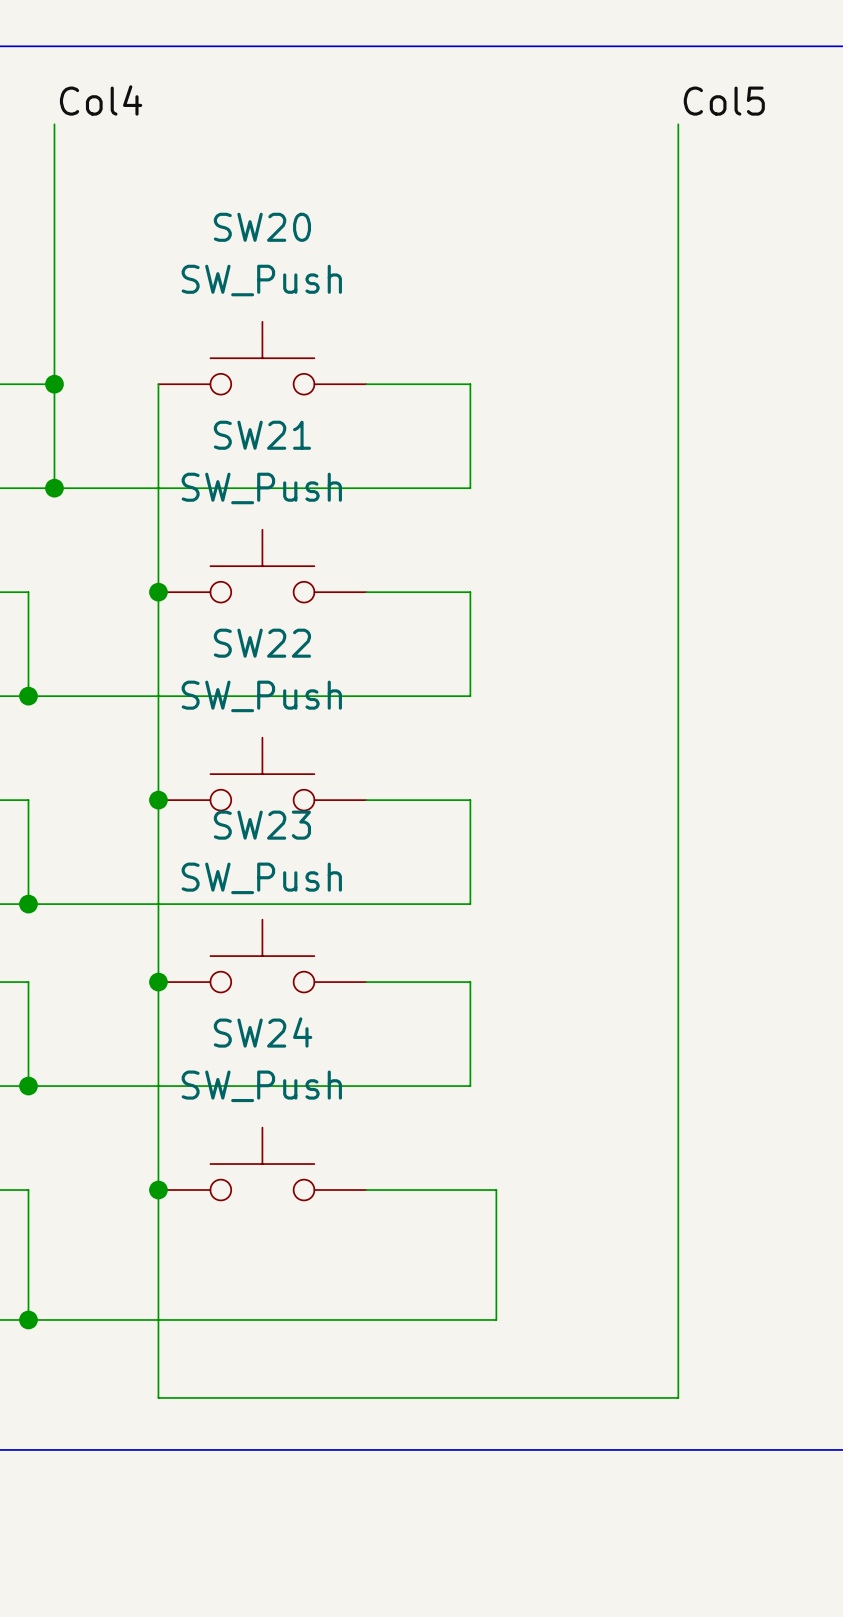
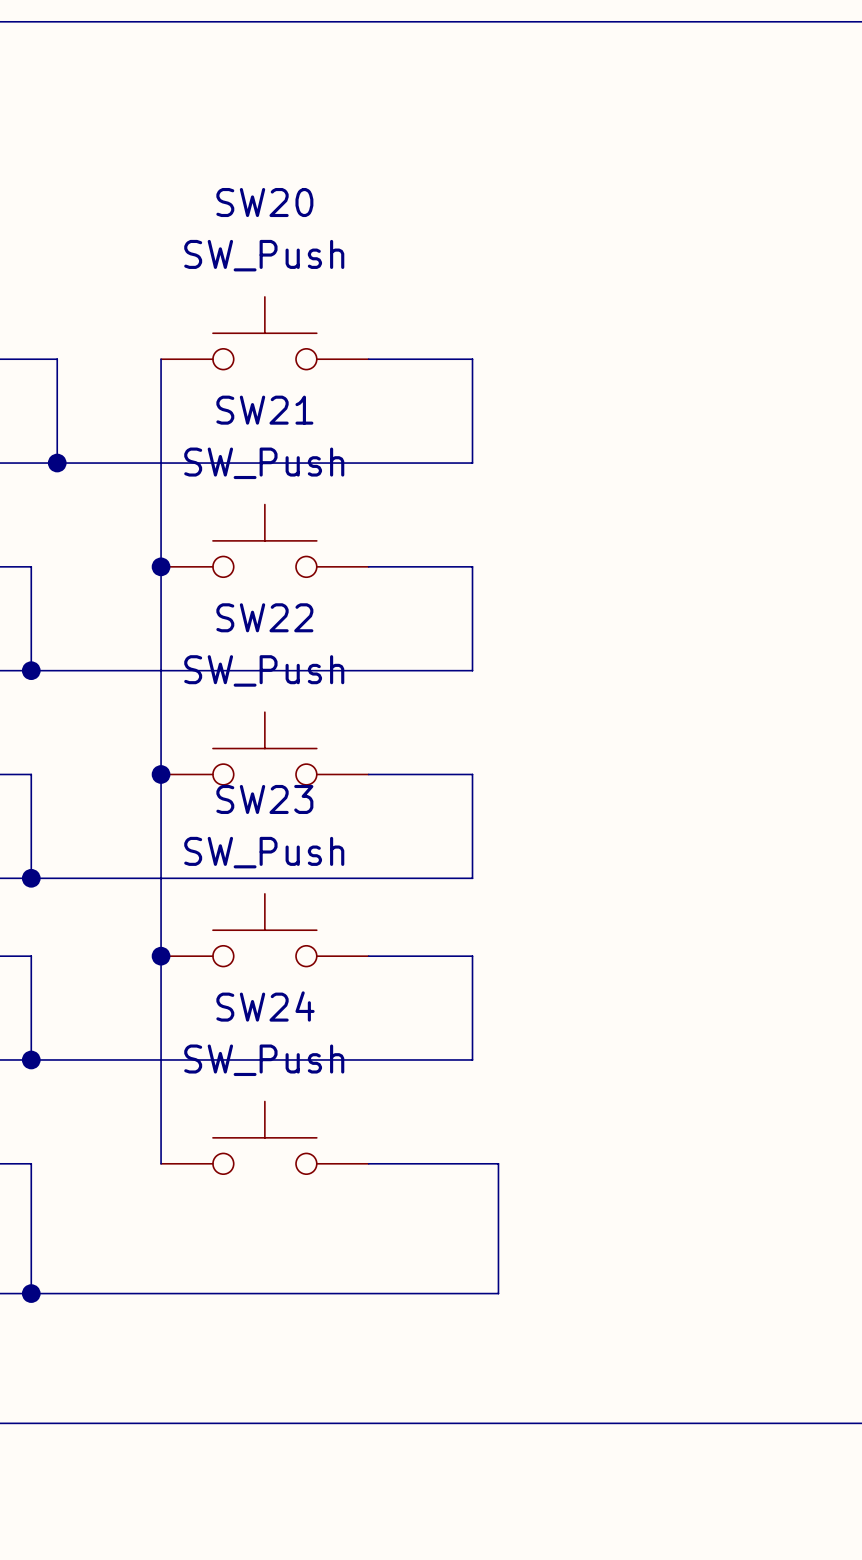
label: Col4 (101, 100) -> none
label: Col5 (724, 101) -> none
wire: (54, 124) (54, 384) -> none
wire: (678, 124) (678, 1397) (158, 1397) (158, 1190) -> none
junction: (54, 384) -> none
junction: (158, 1190) -> none

